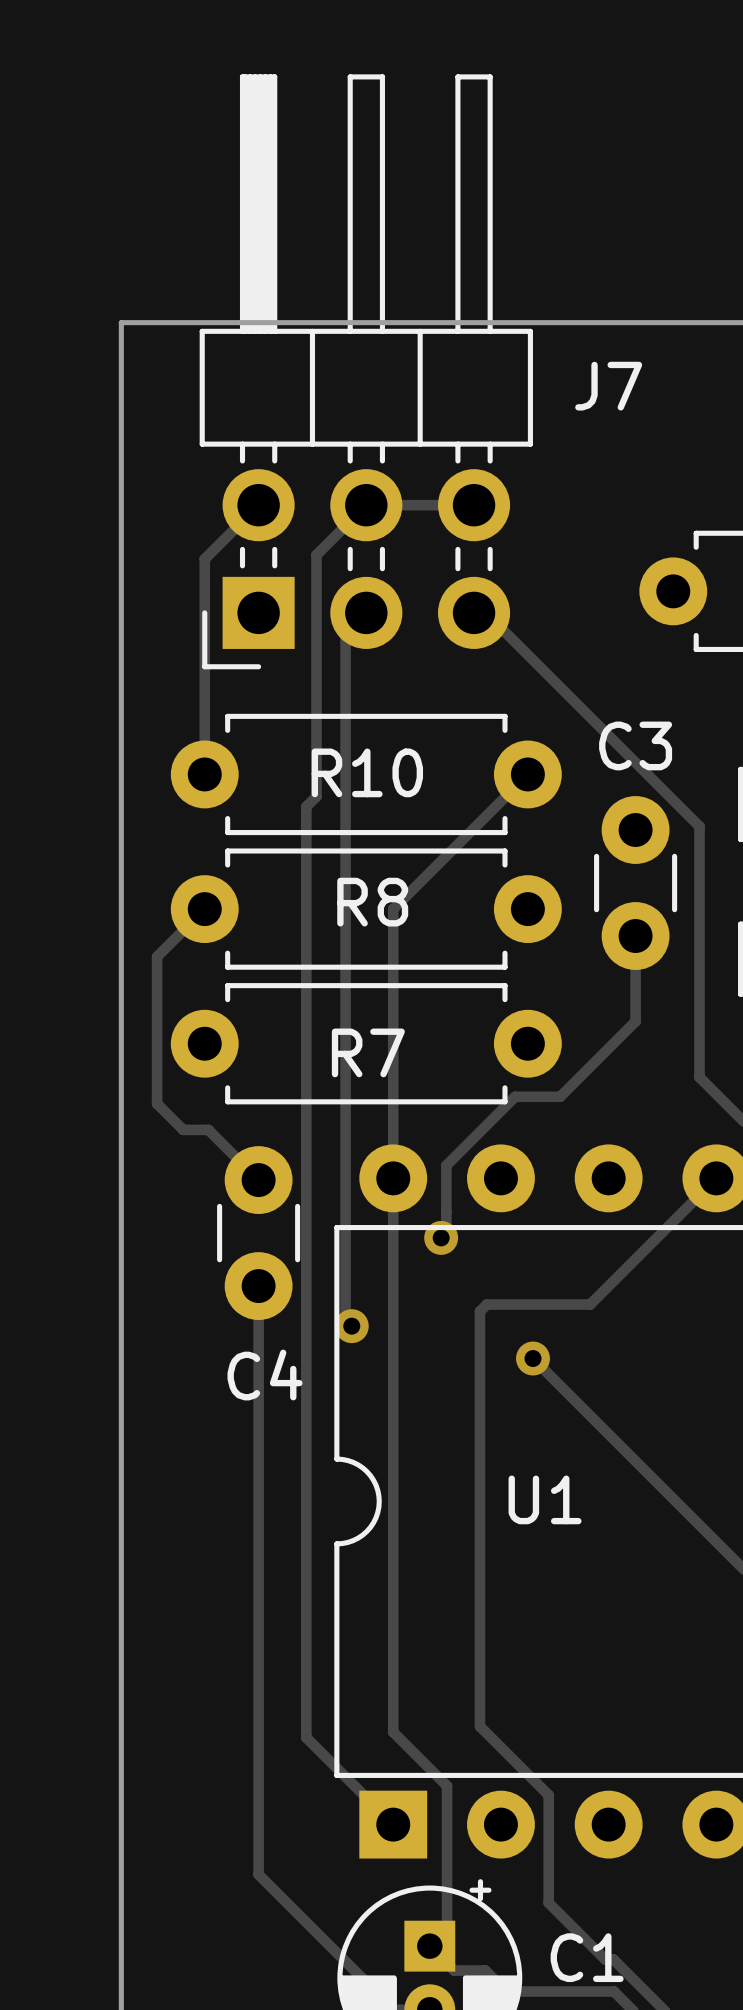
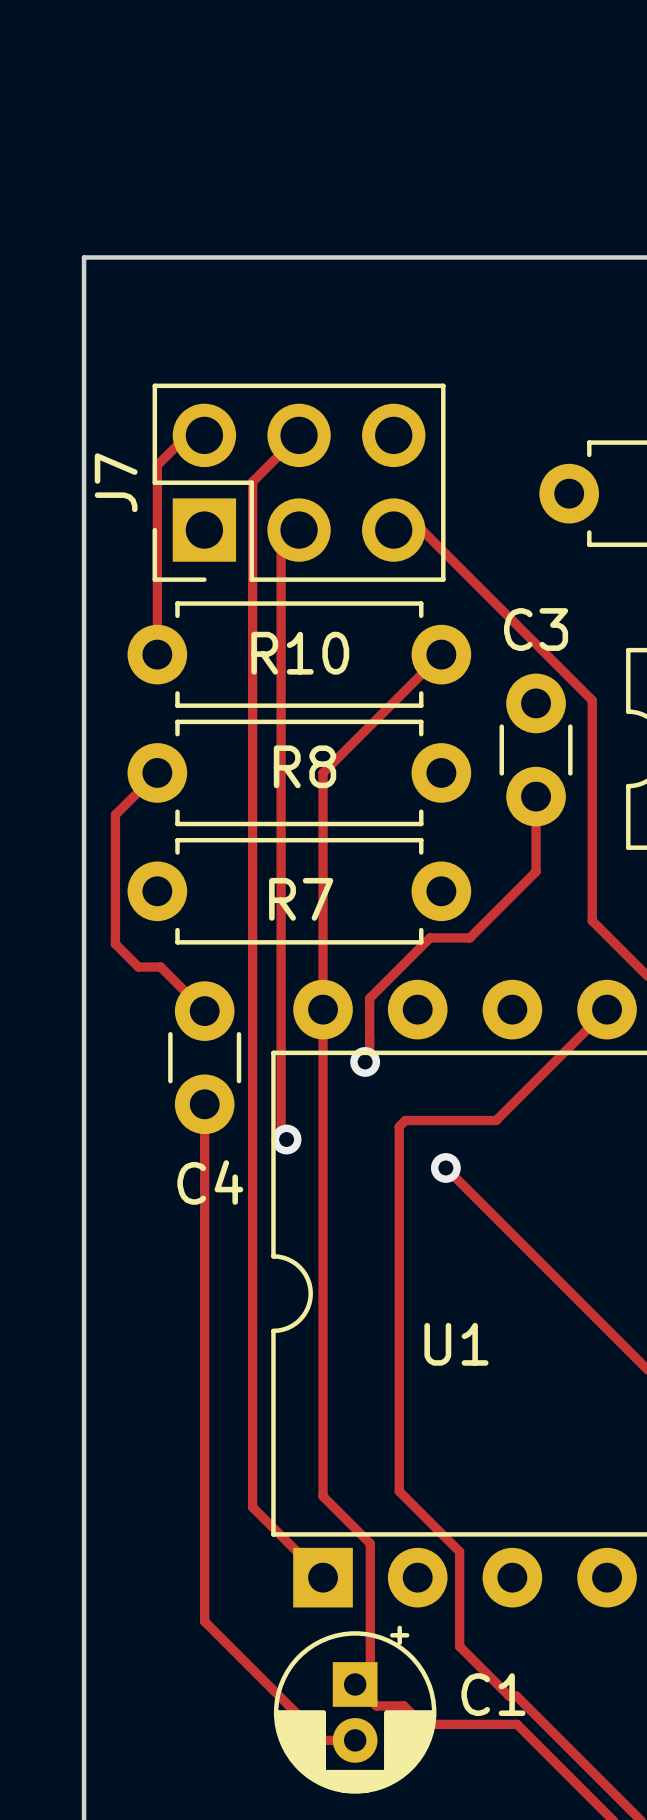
J7 footprint: [199, 74, 533, 670] -> [152, 383, 446, 582]
J7 name position: J7 (608, 386) -> J7 (116, 482)
track: (474, 505) (366, 505) (316, 555) (316, 796) (306, 806) (306, 1737) (313, 1744) -> (299, 435) (252, 481) (252, 1507)
U1 name position: U1 (545, 1499) -> U1 (456, 1344)

